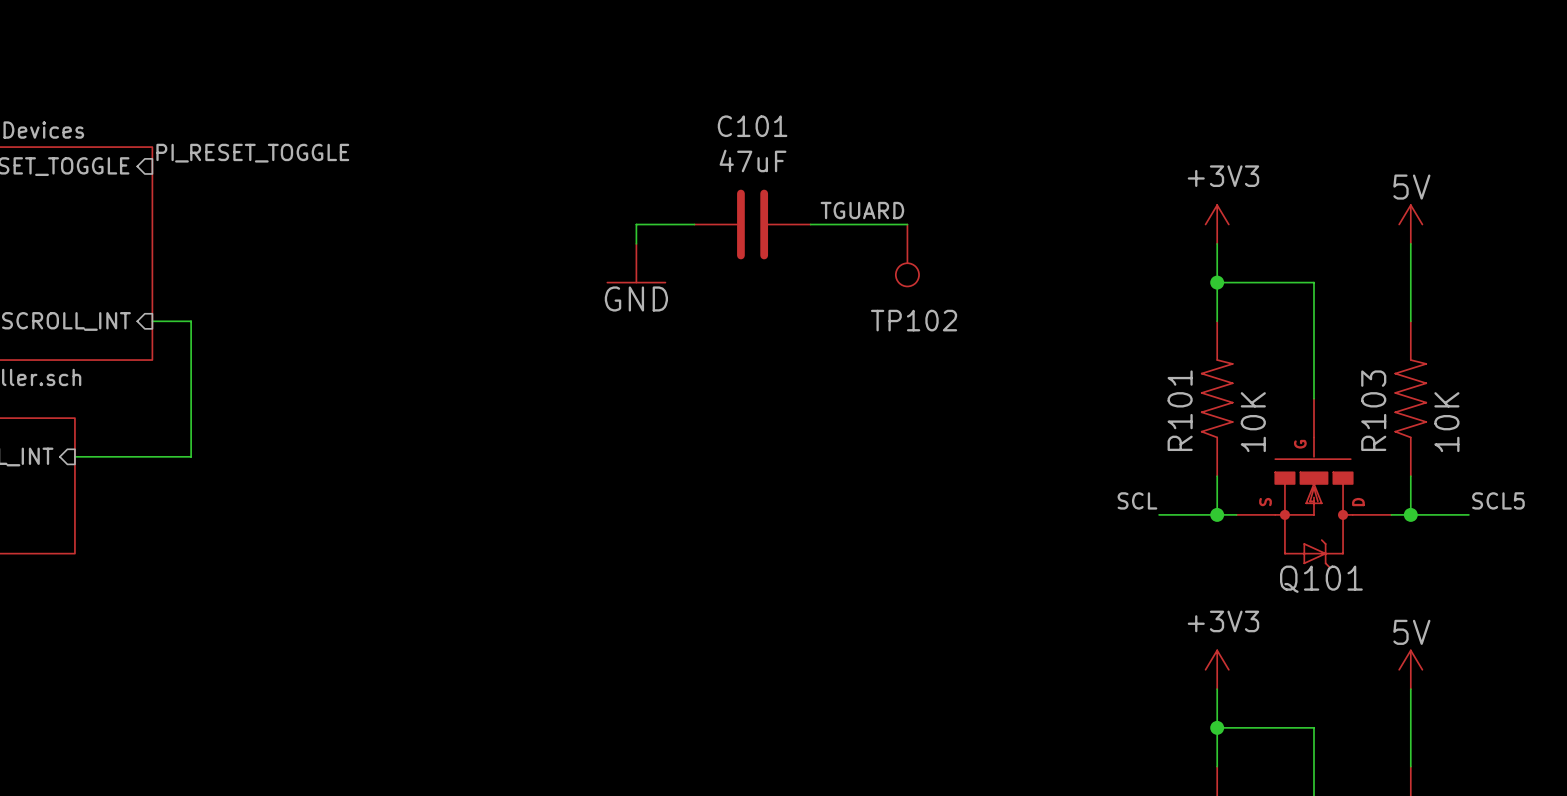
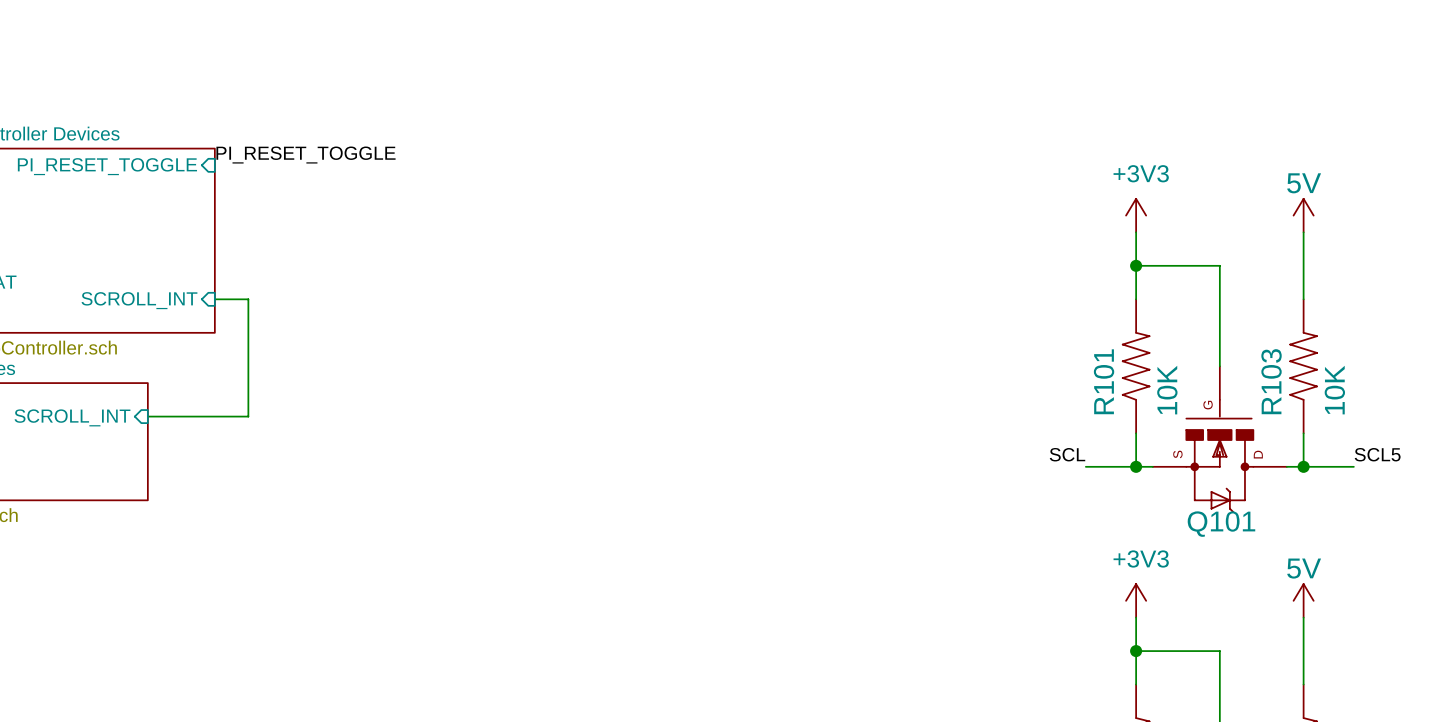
label: TGUARD (862, 210) -> none
wire: (694, 224) (636, 224) (636, 243) -> none
C101: 47uF (752, 224) -> none
wire: (810, 224) (907, 224) -> none
TP102: (907, 255) -> none
power symbol: GND (636, 263) -> none

